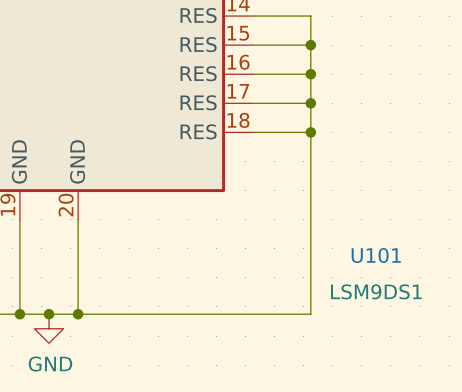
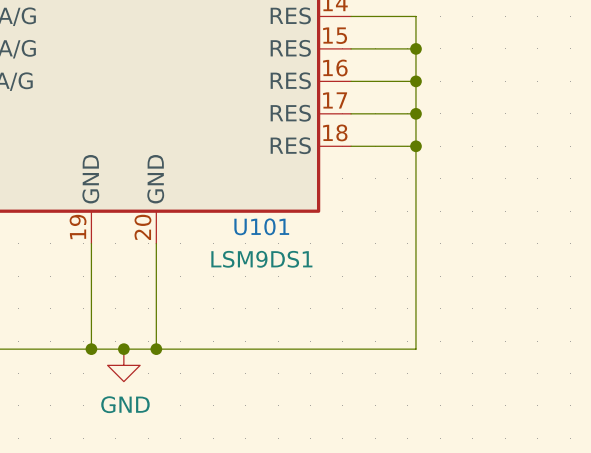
U101 name position: U101 (376, 255) -> U101 (261, 226)
U101 value position: LSM9DS1 (376, 291) -> LSM9DS1 (261, 259)

